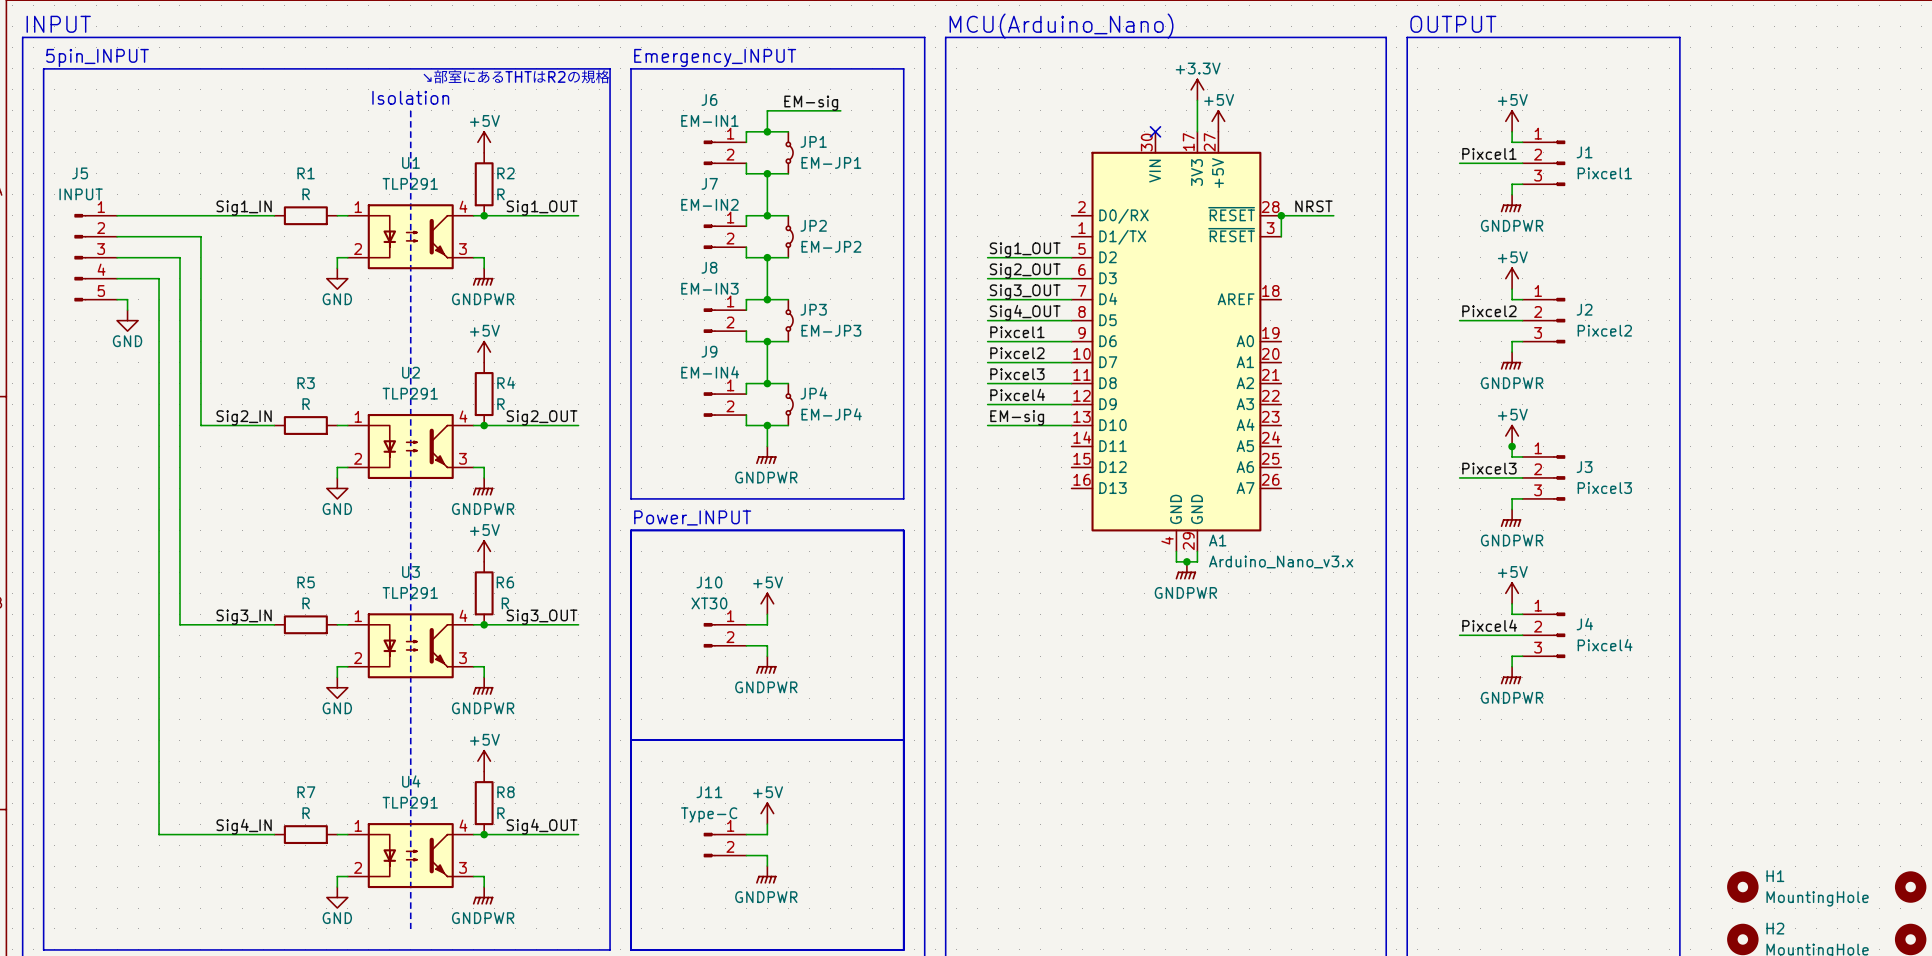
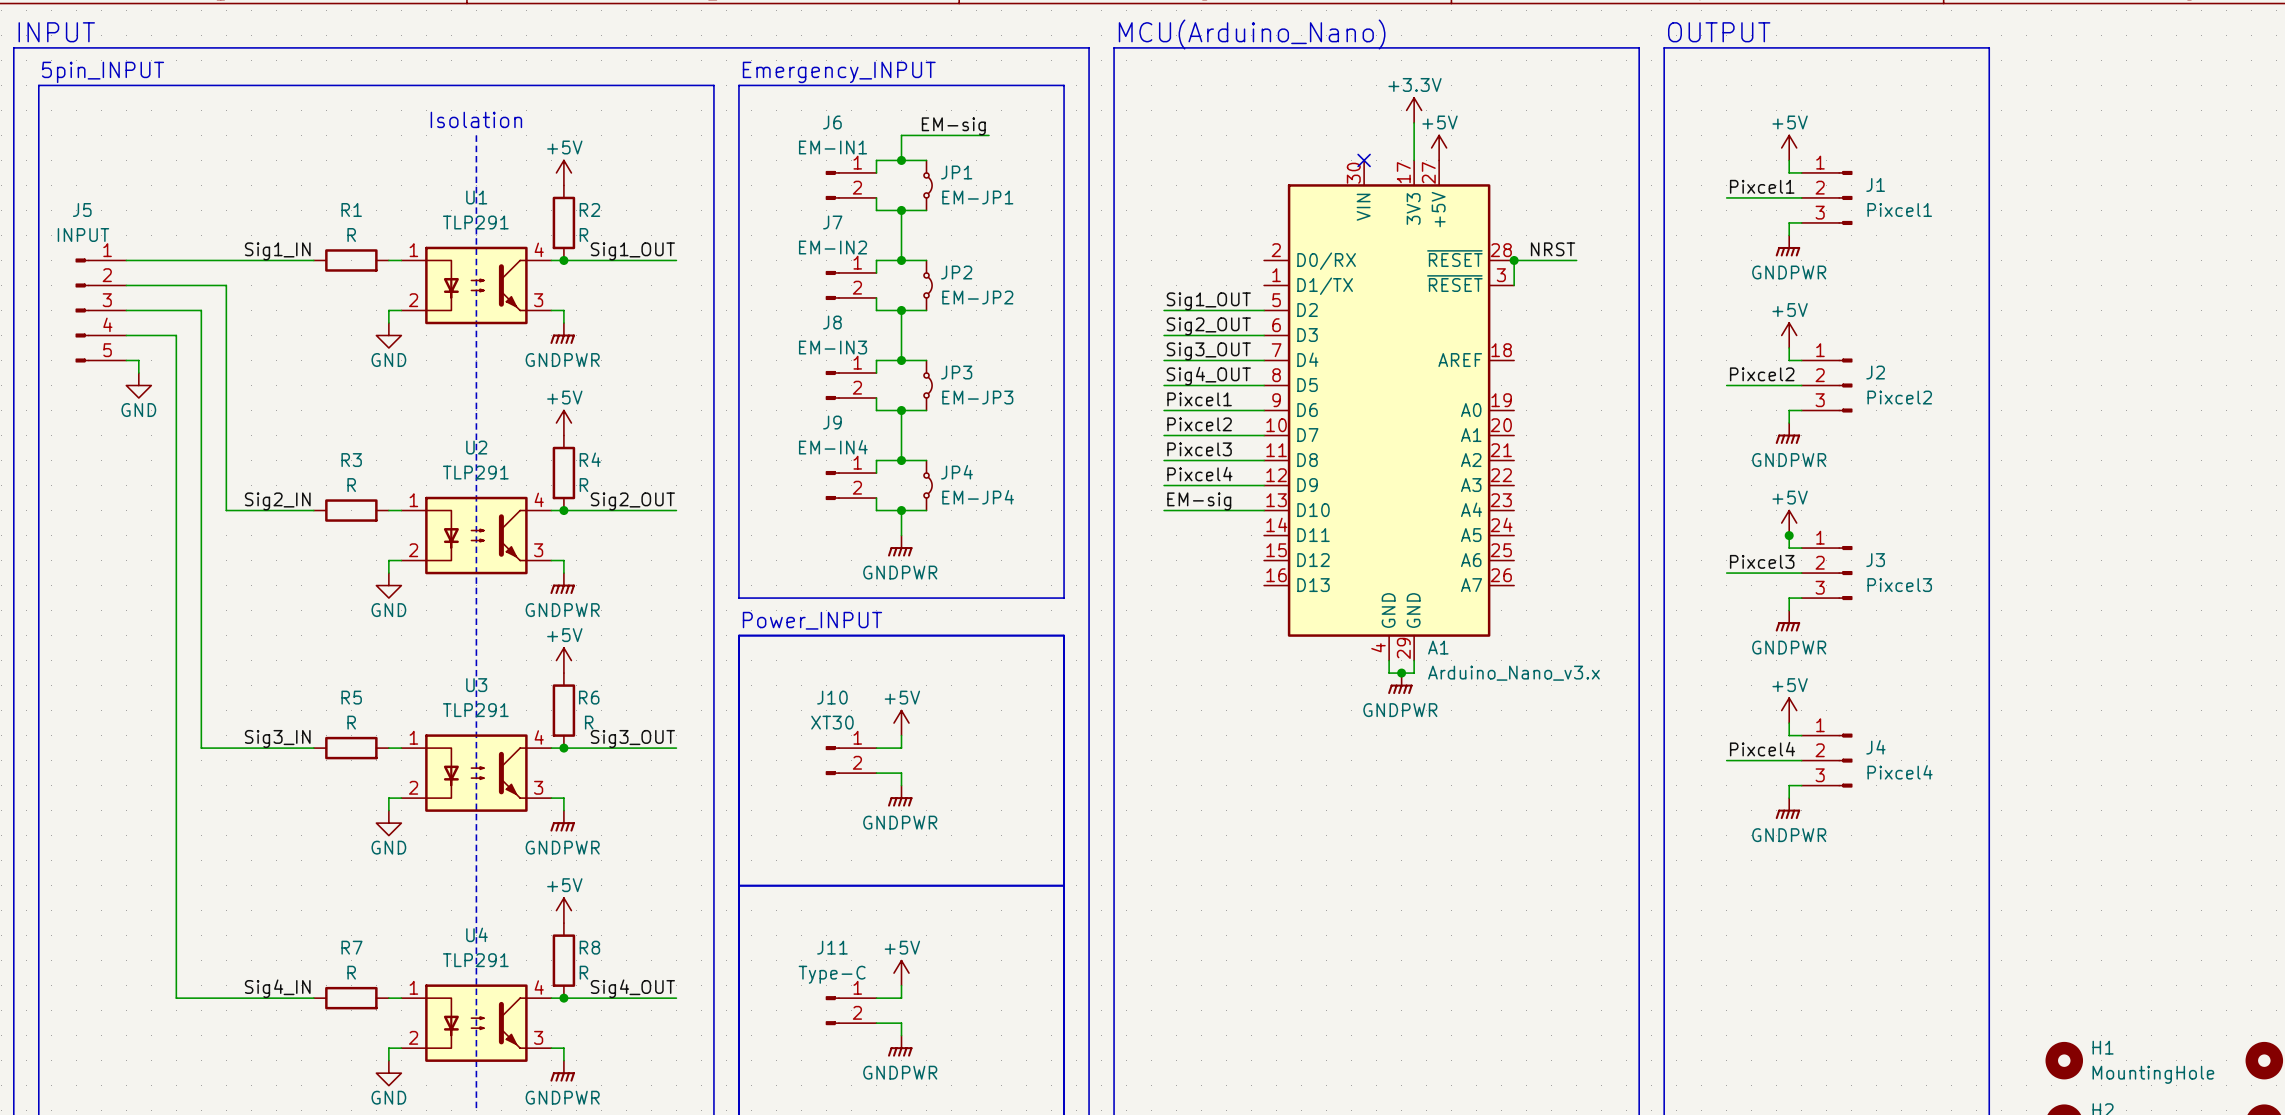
text: ↘部室にあるTHTはR2の規格 (516, 76) -> none

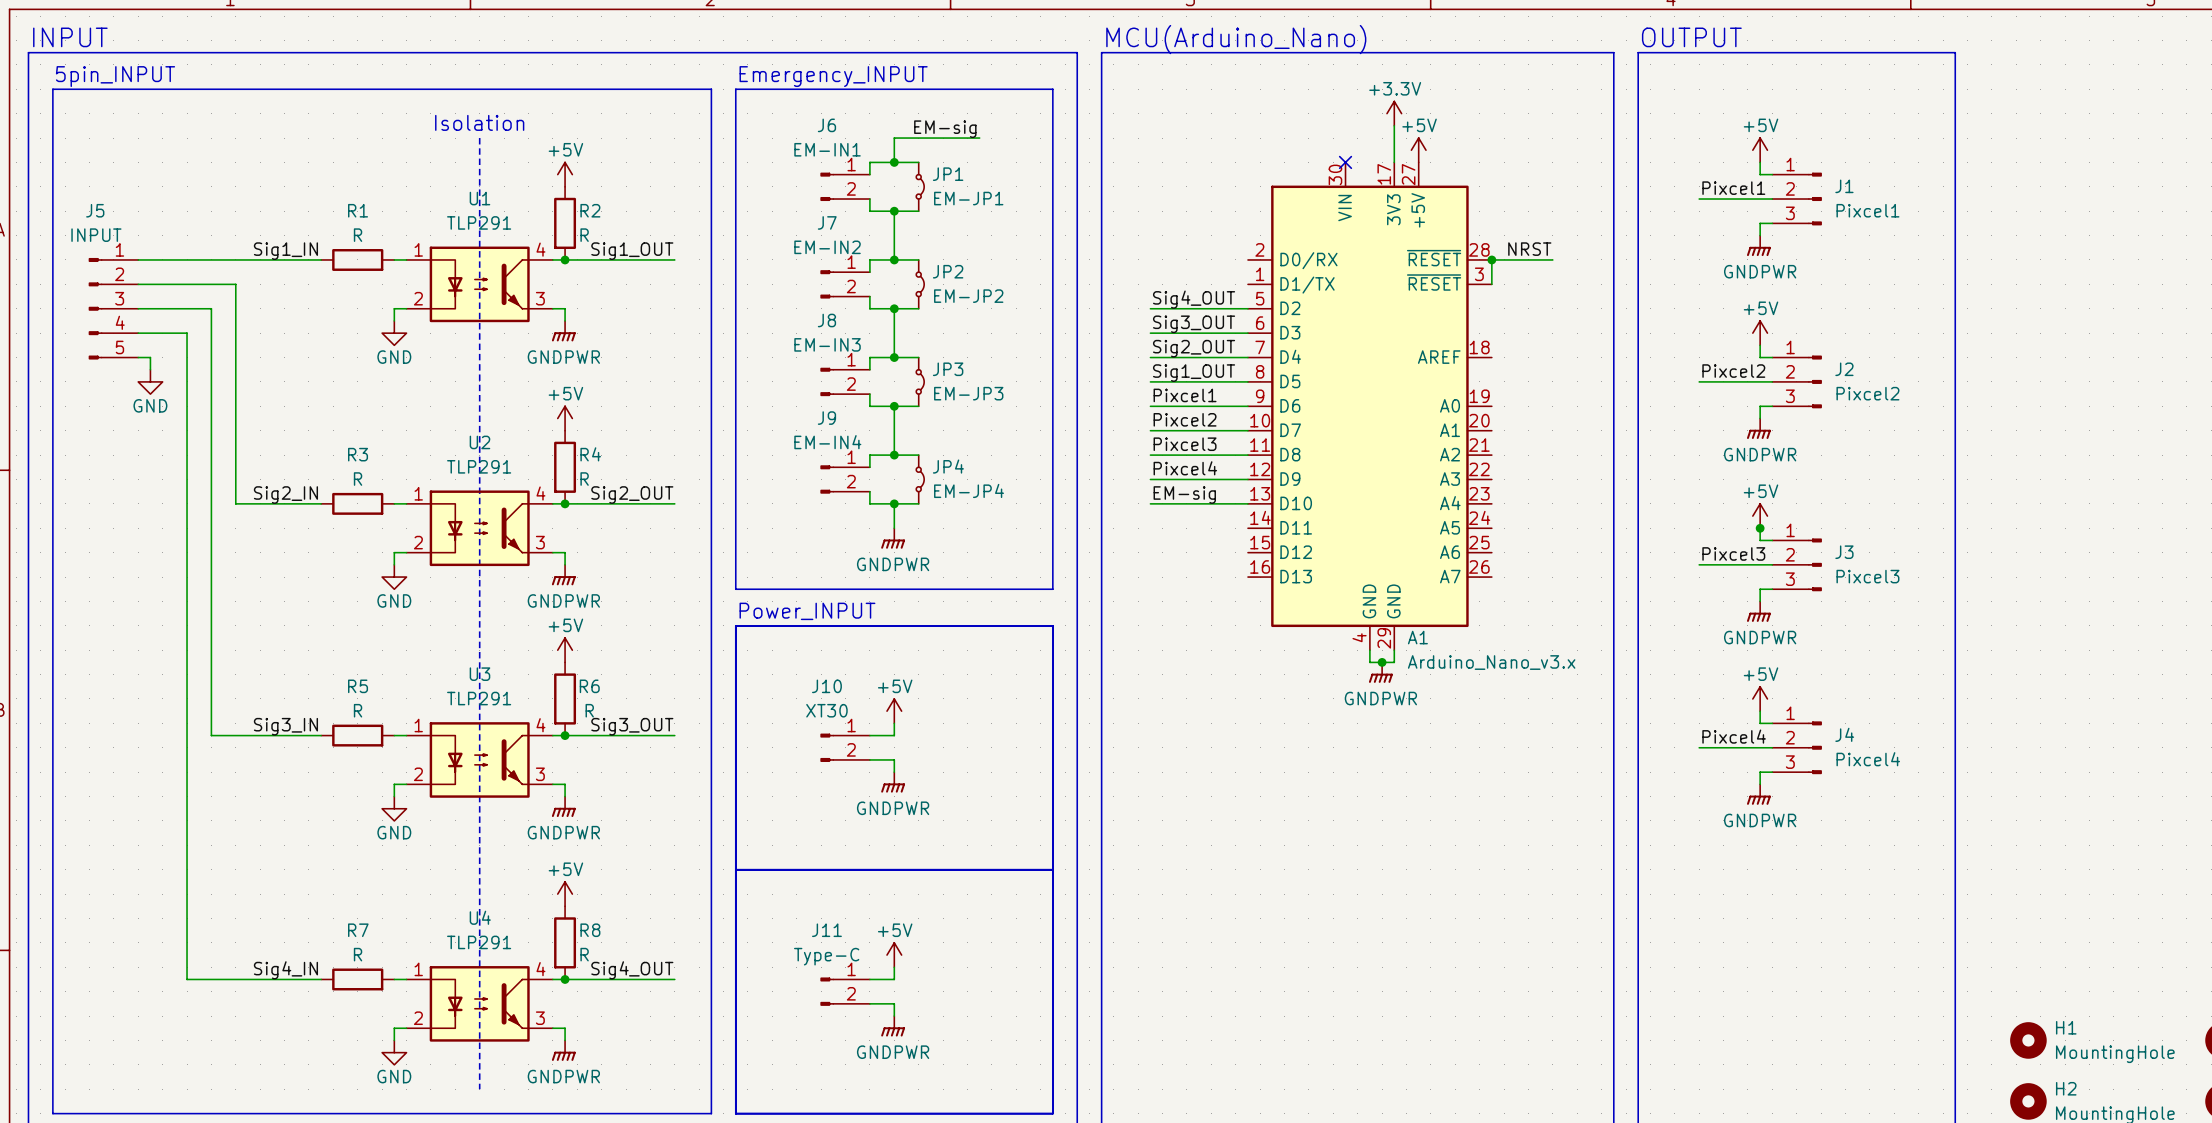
label: Sig1_OUT (1208, 301) -> Sig4_OUT (1194, 299)
label: Sig2_OUT (1208, 326) -> Sig3_OUT (1194, 324)
label: Sig3_OUT (1208, 351) -> Sig2_OUT (1194, 348)
label: Sig4_OUT (1208, 376) -> Sig1_OUT (1194, 373)

